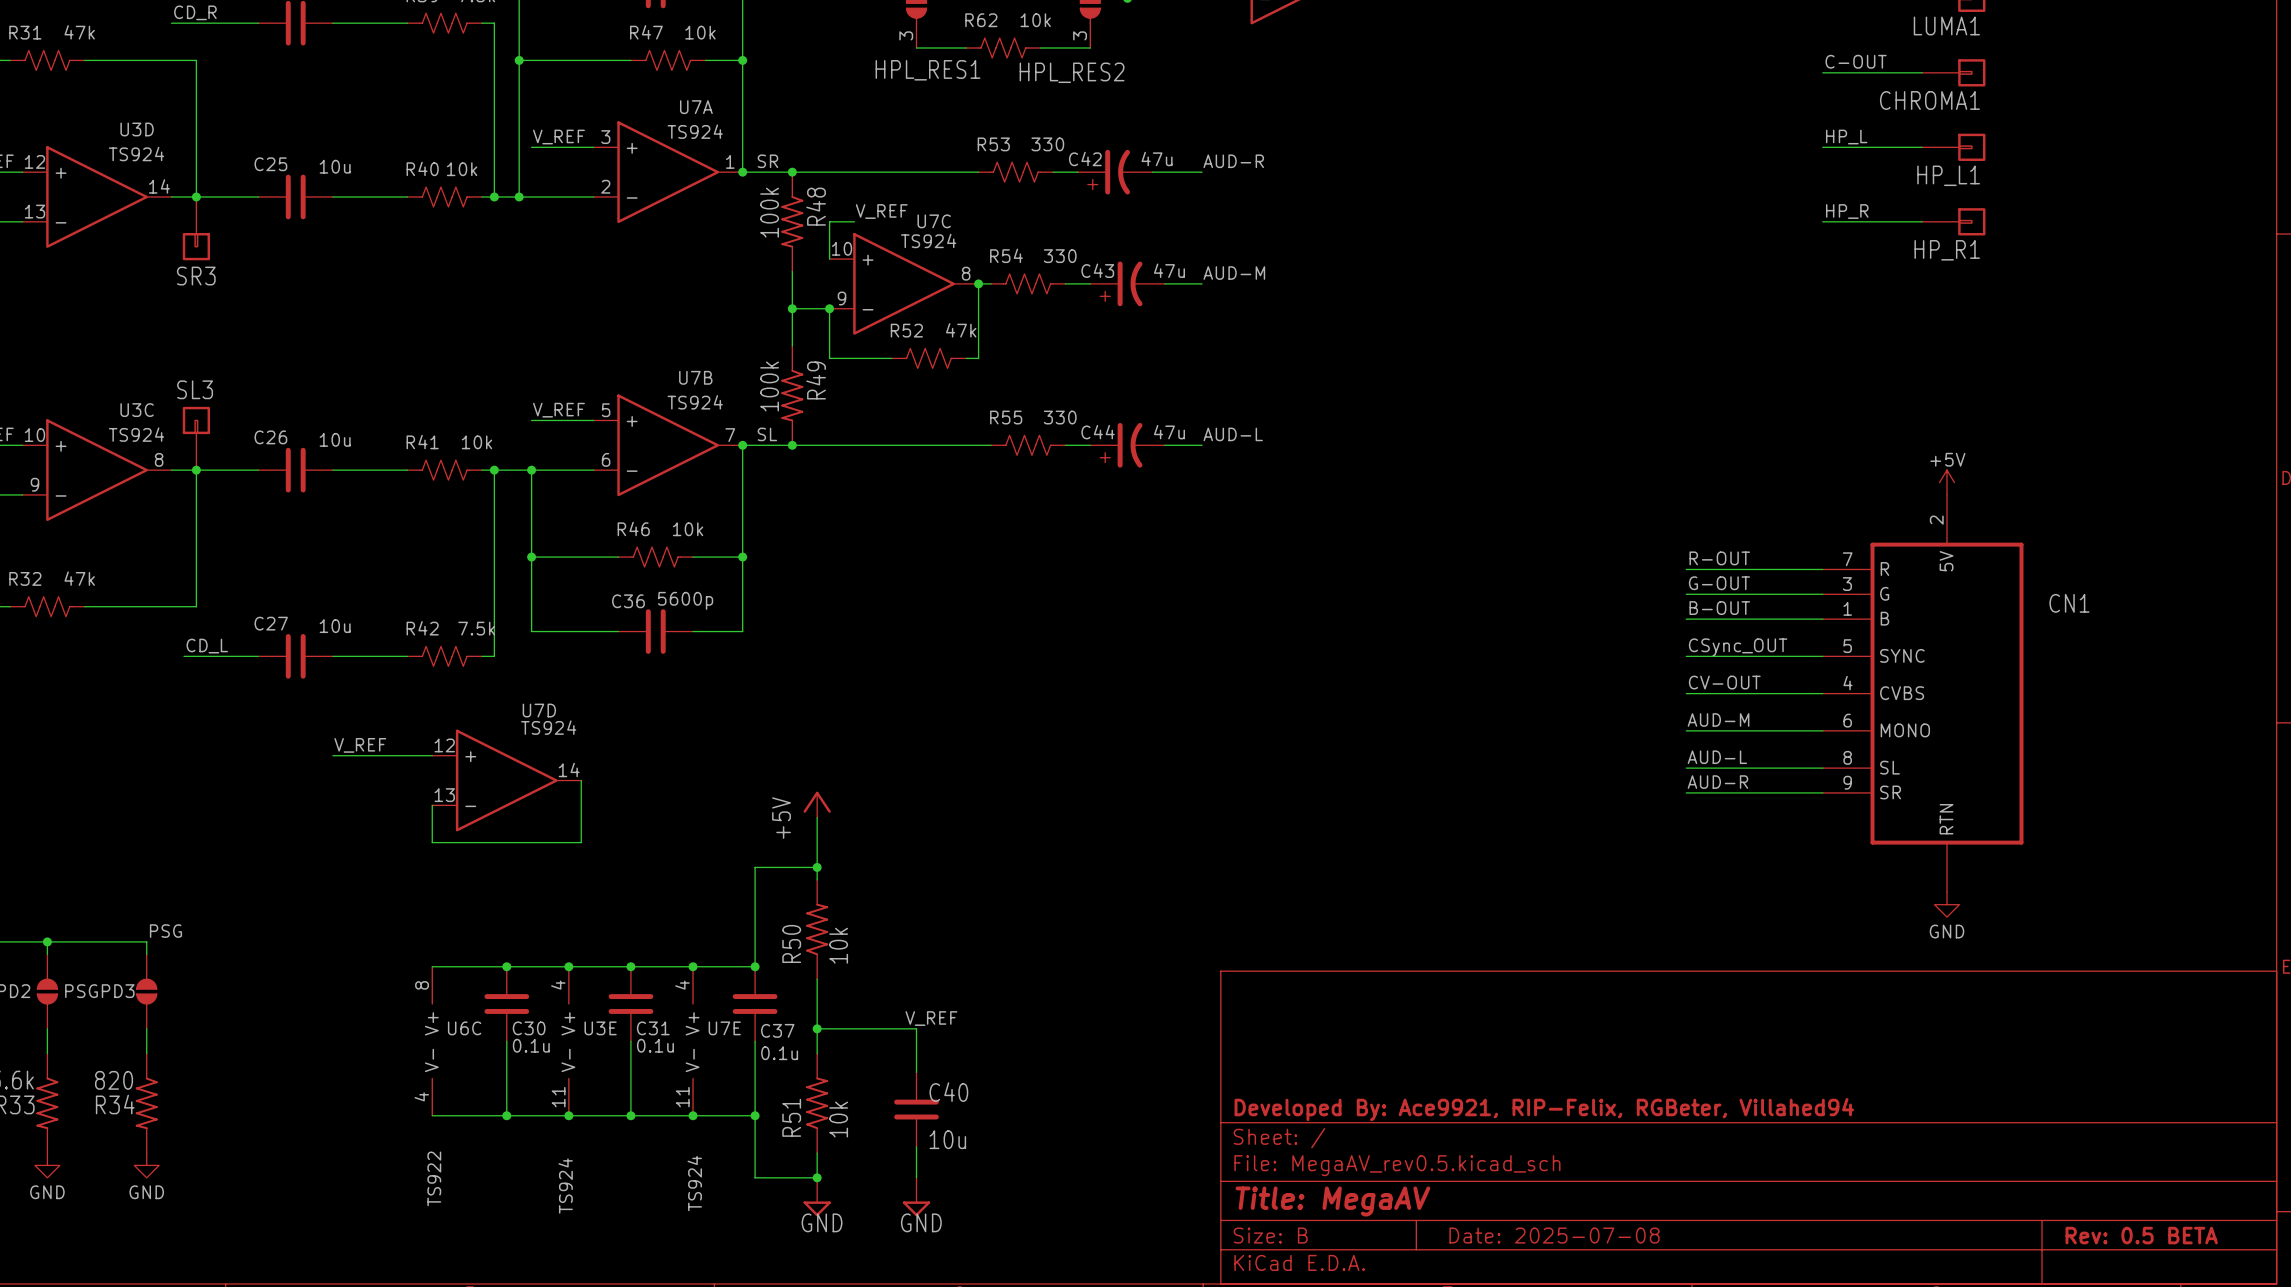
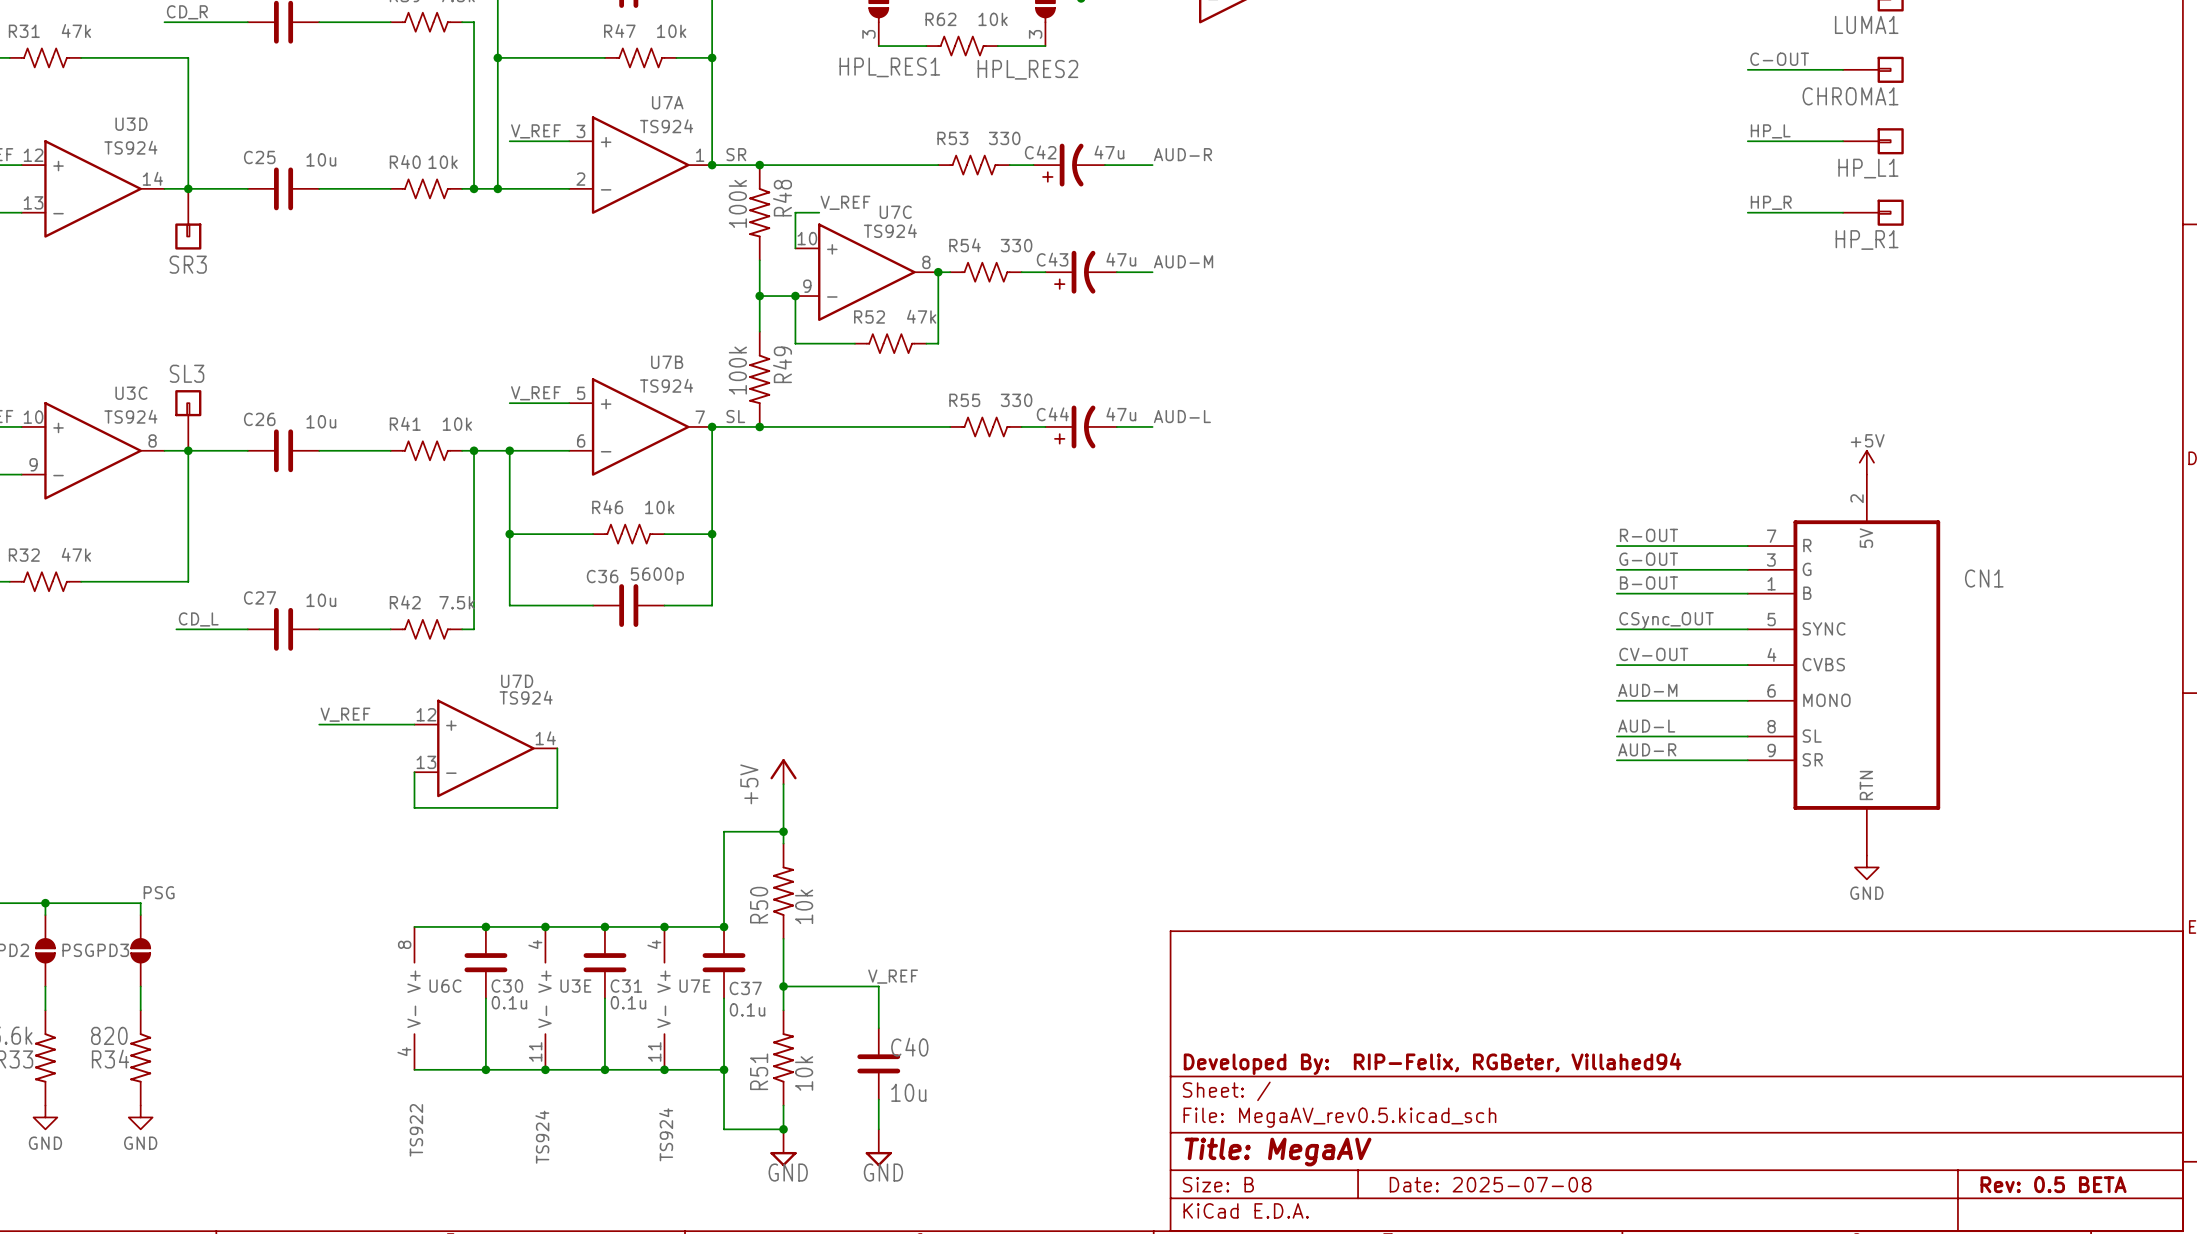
title block: Developed By: Ace9921, RIP-Felix, RGBeter, Villahed94 (1544, 1109) -> Developed By: RIP-Felix, RGBeter, Villahed94 (1432, 1063)

